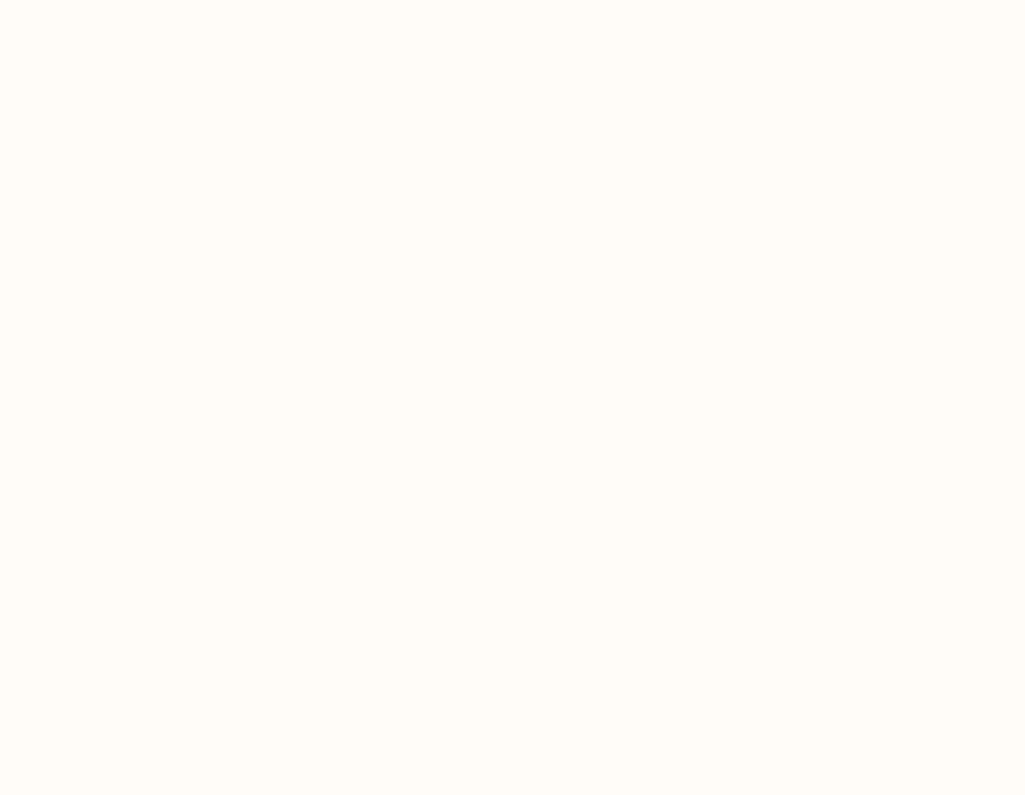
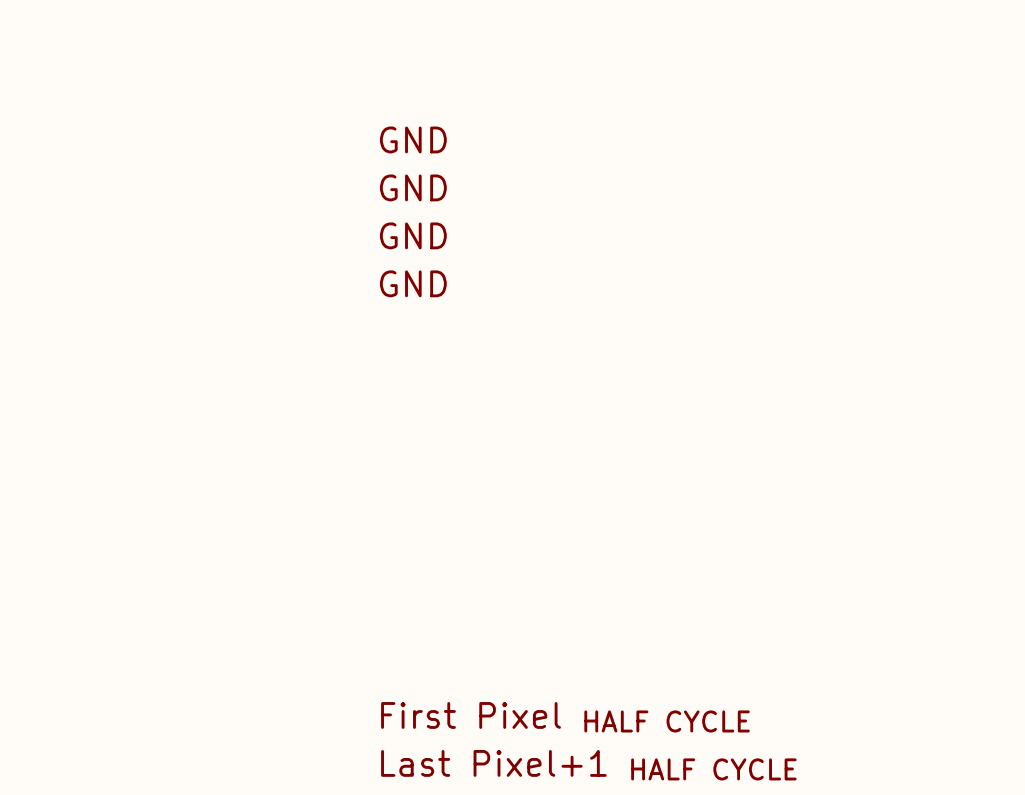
label: none -> GND (413, 139)
label: none -> GND (413, 187)
label: none -> GND (413, 235)
label: none -> GND (413, 283)
label: none -> First Pixel HALF CYCLE (565, 717)
label: none -> Last Pixel+1 HALF CYCLE (588, 765)

